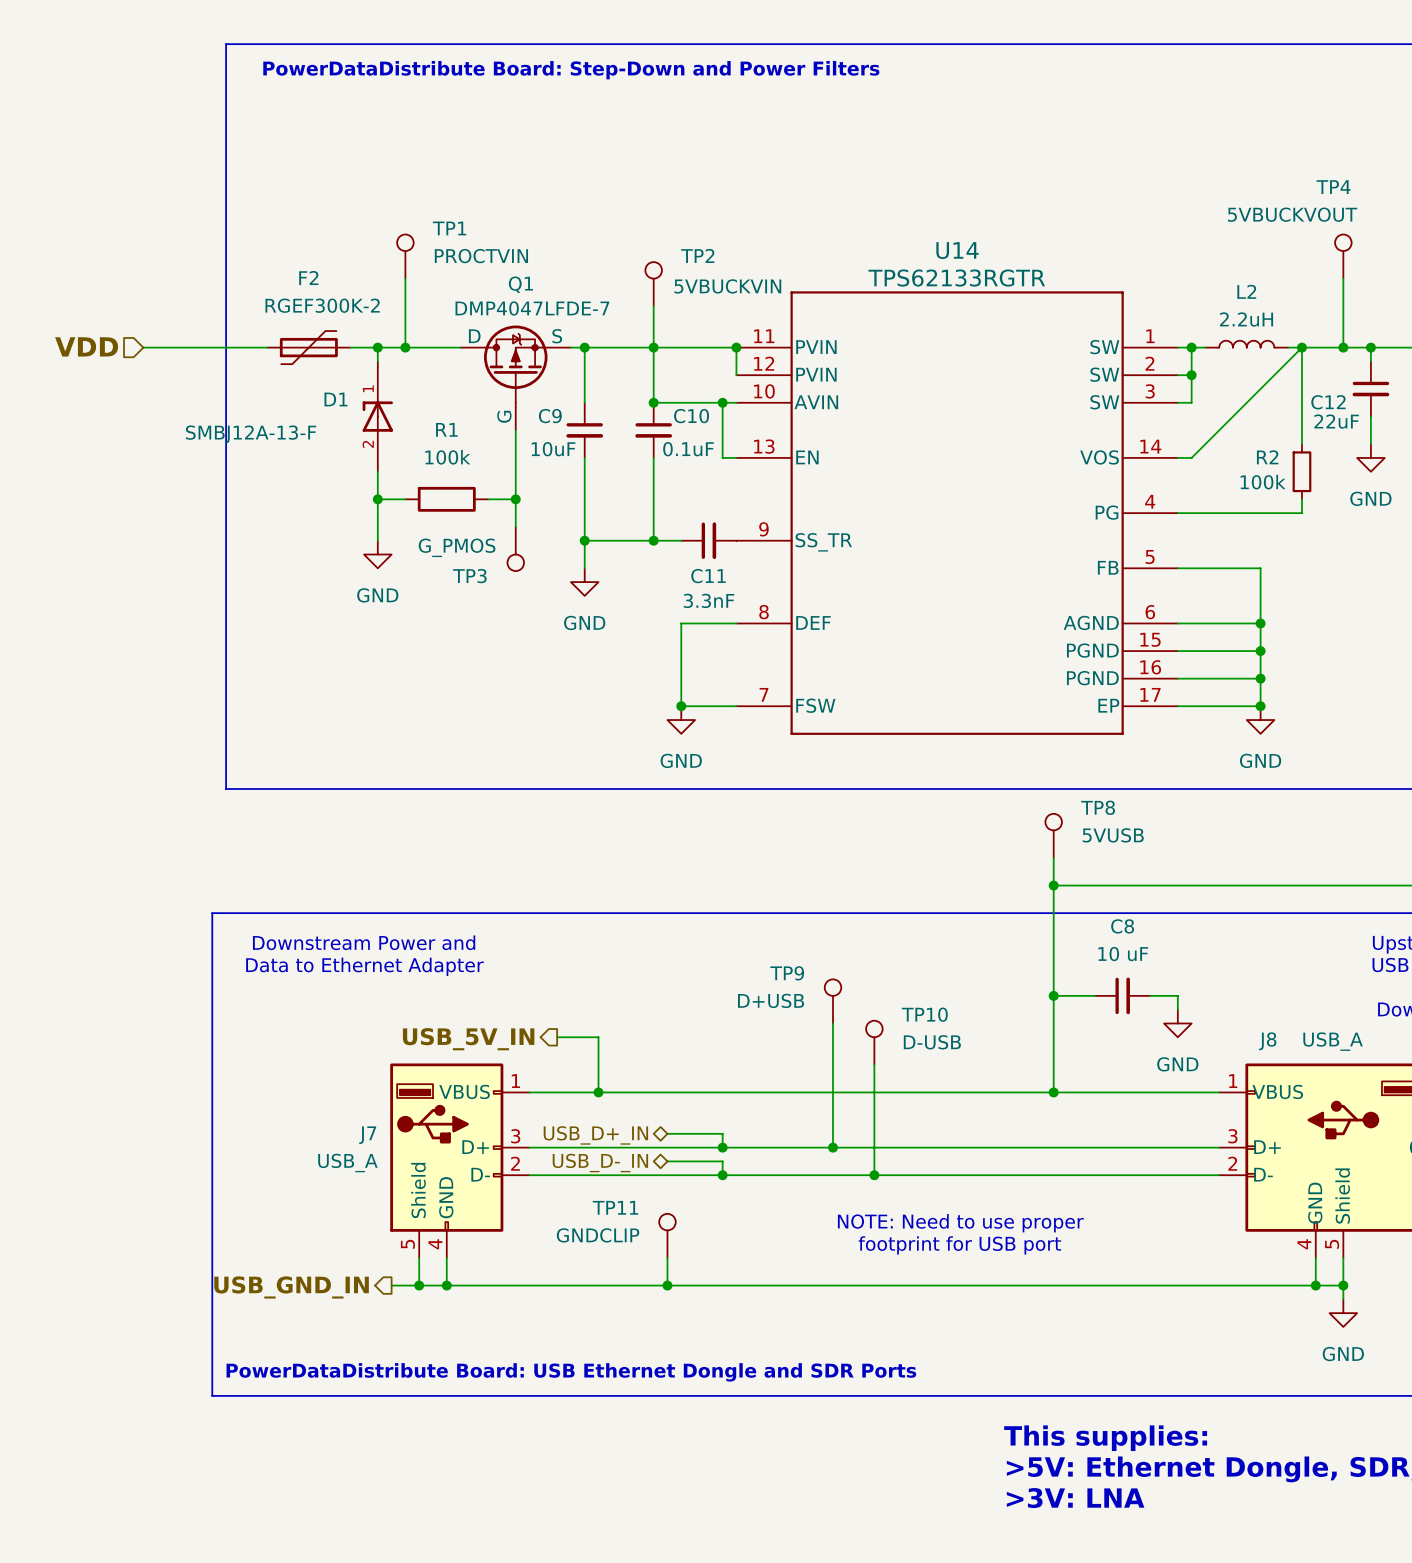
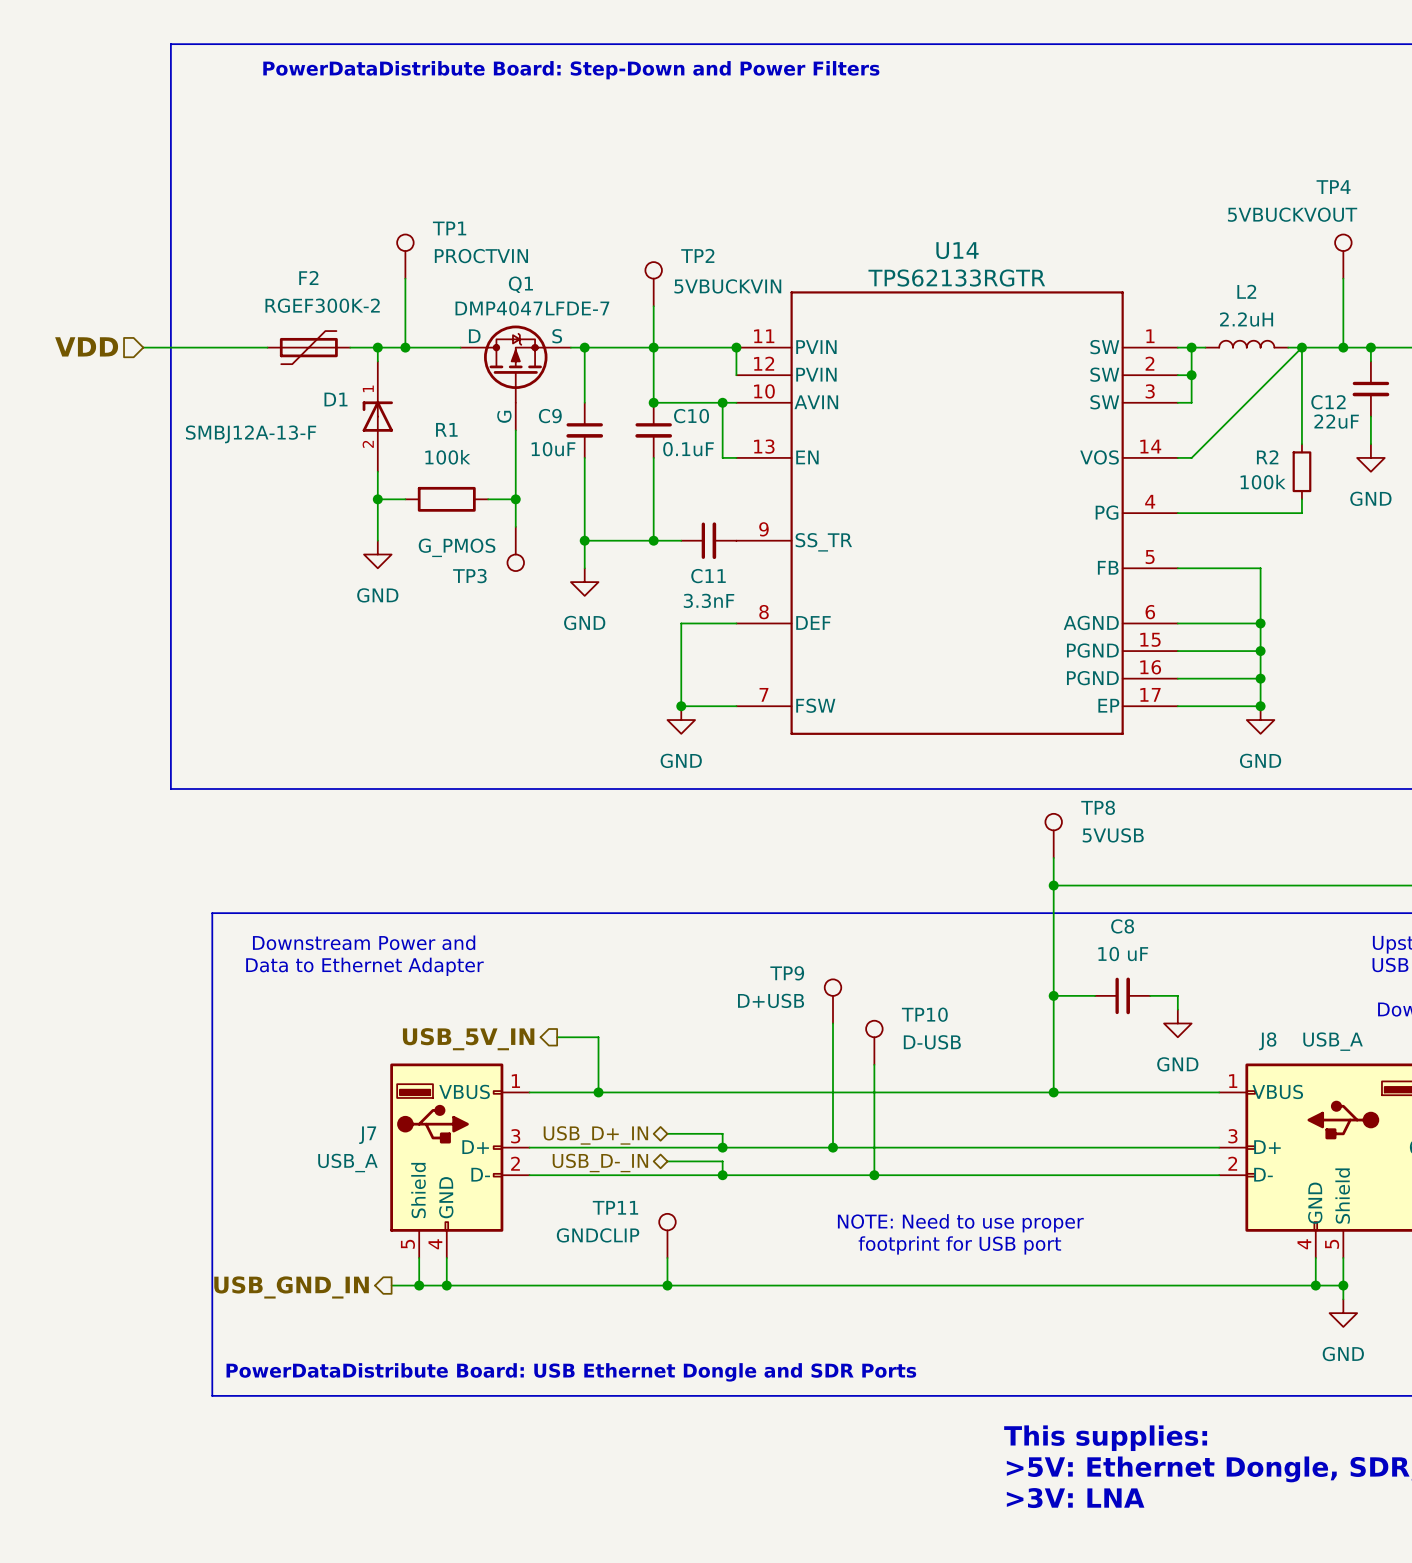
line: (226, 44) (226, 788) -> (226, 44) (170, 44) (170, 788) (226, 788)

